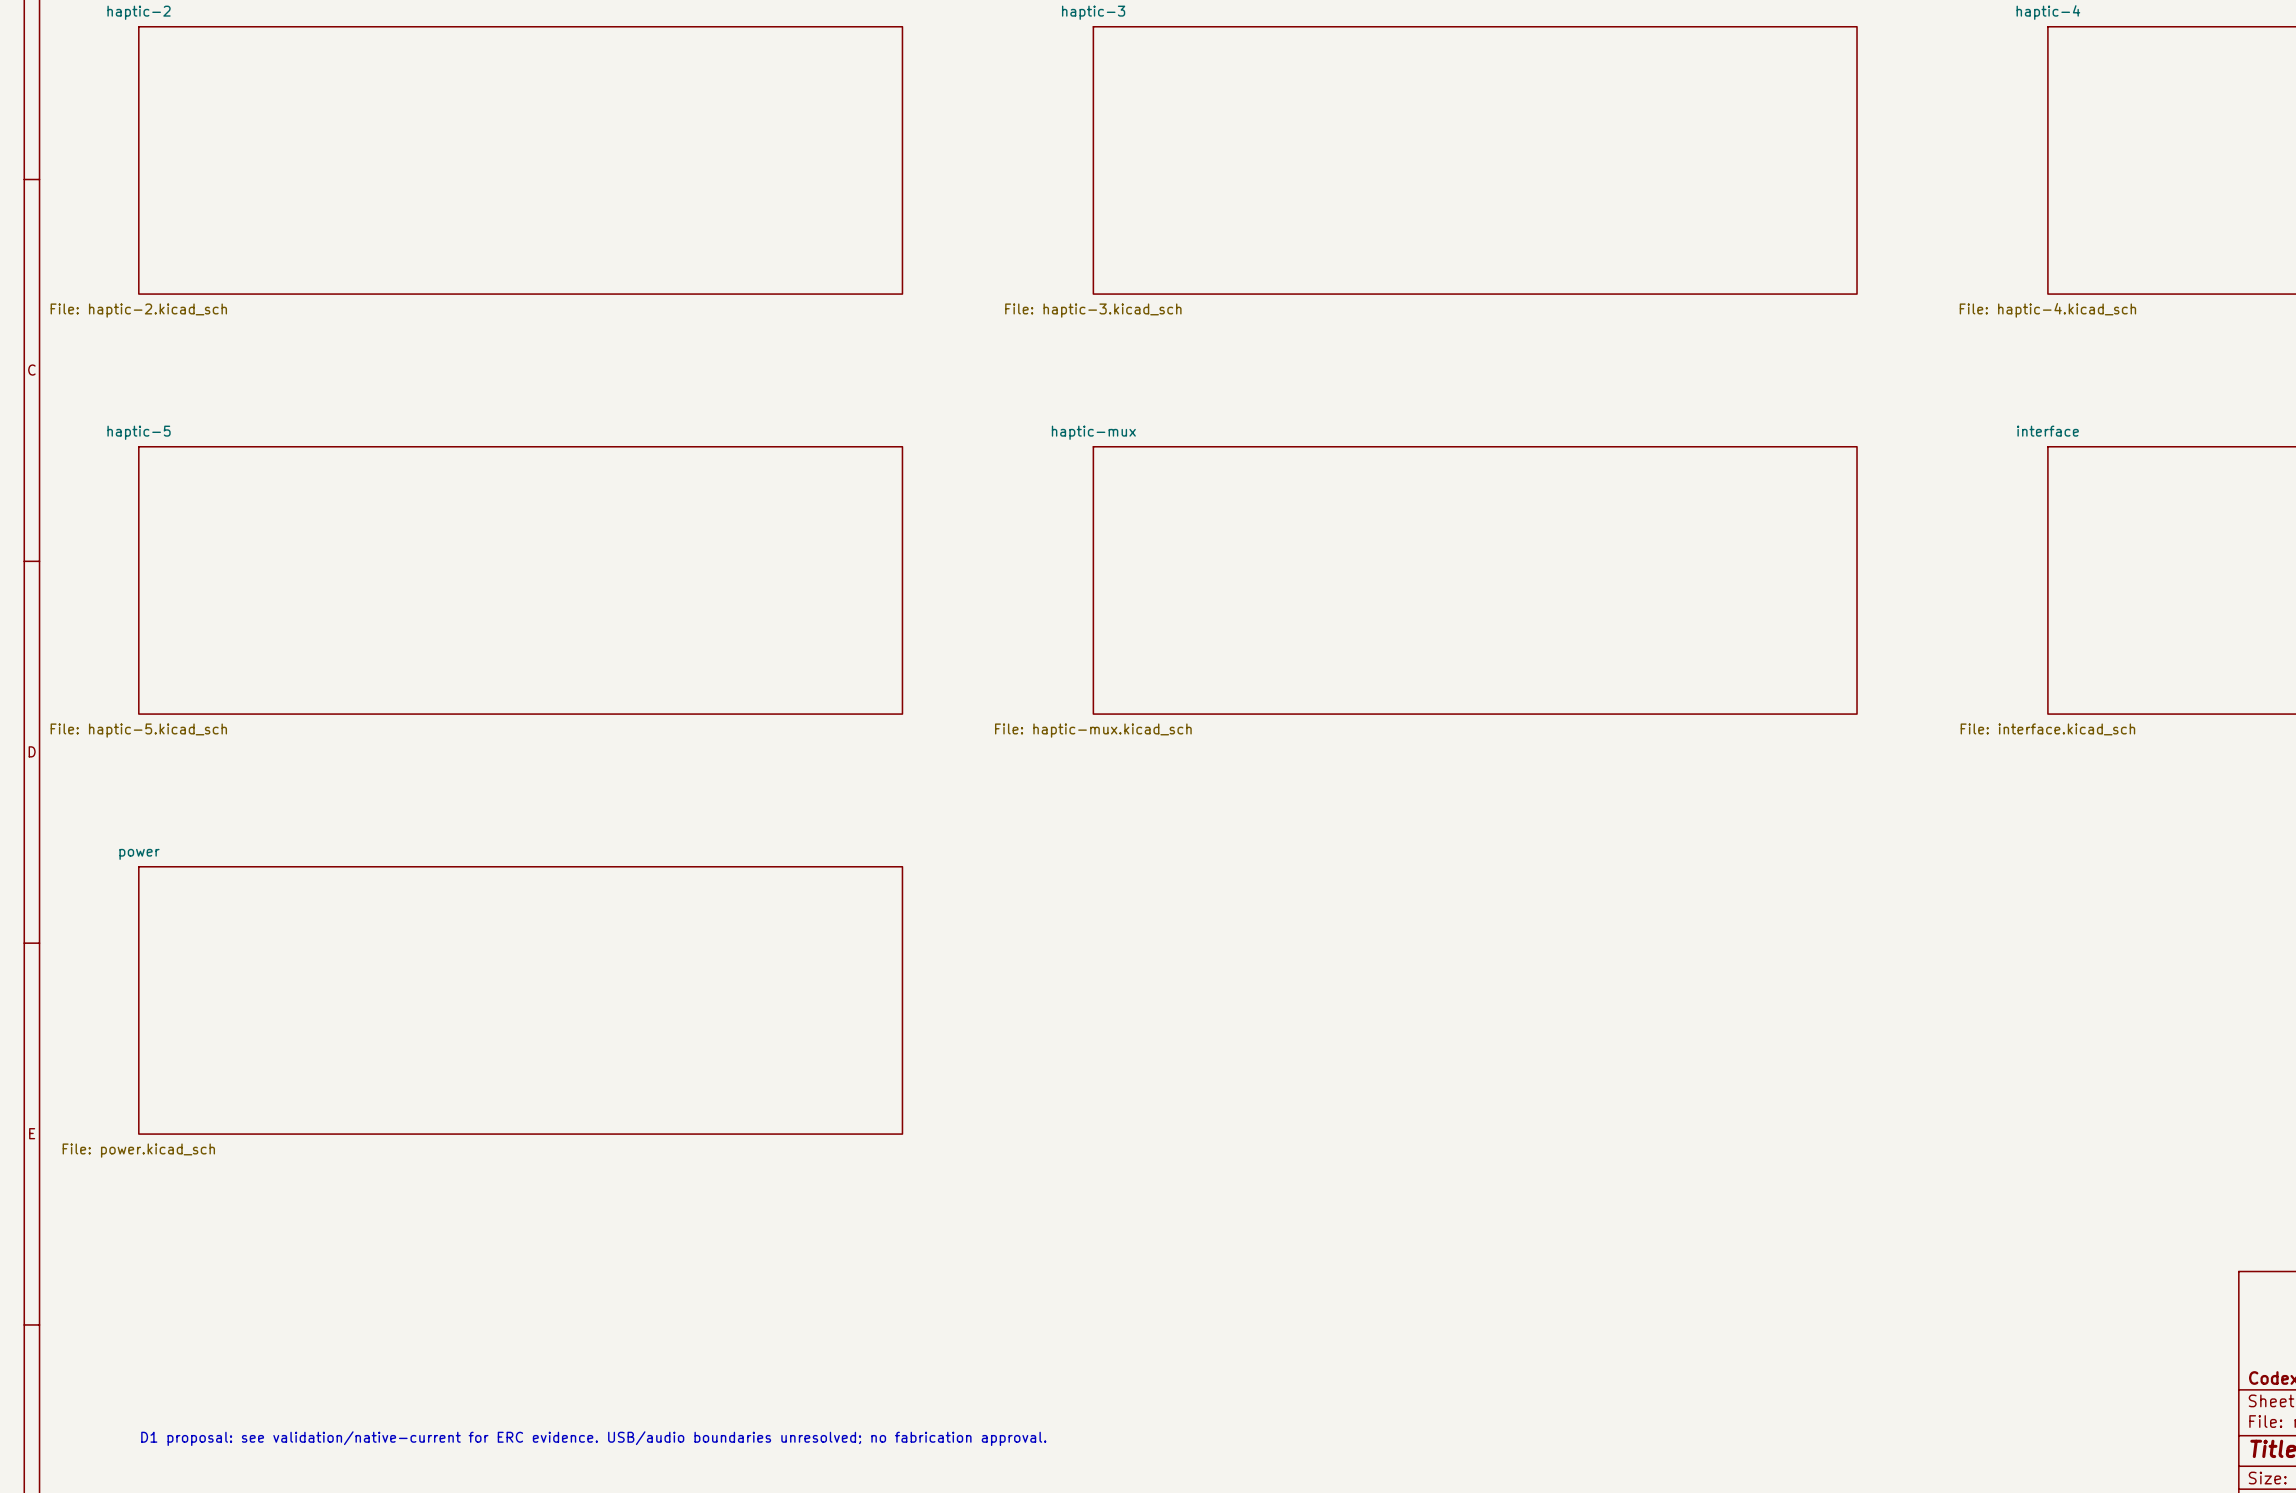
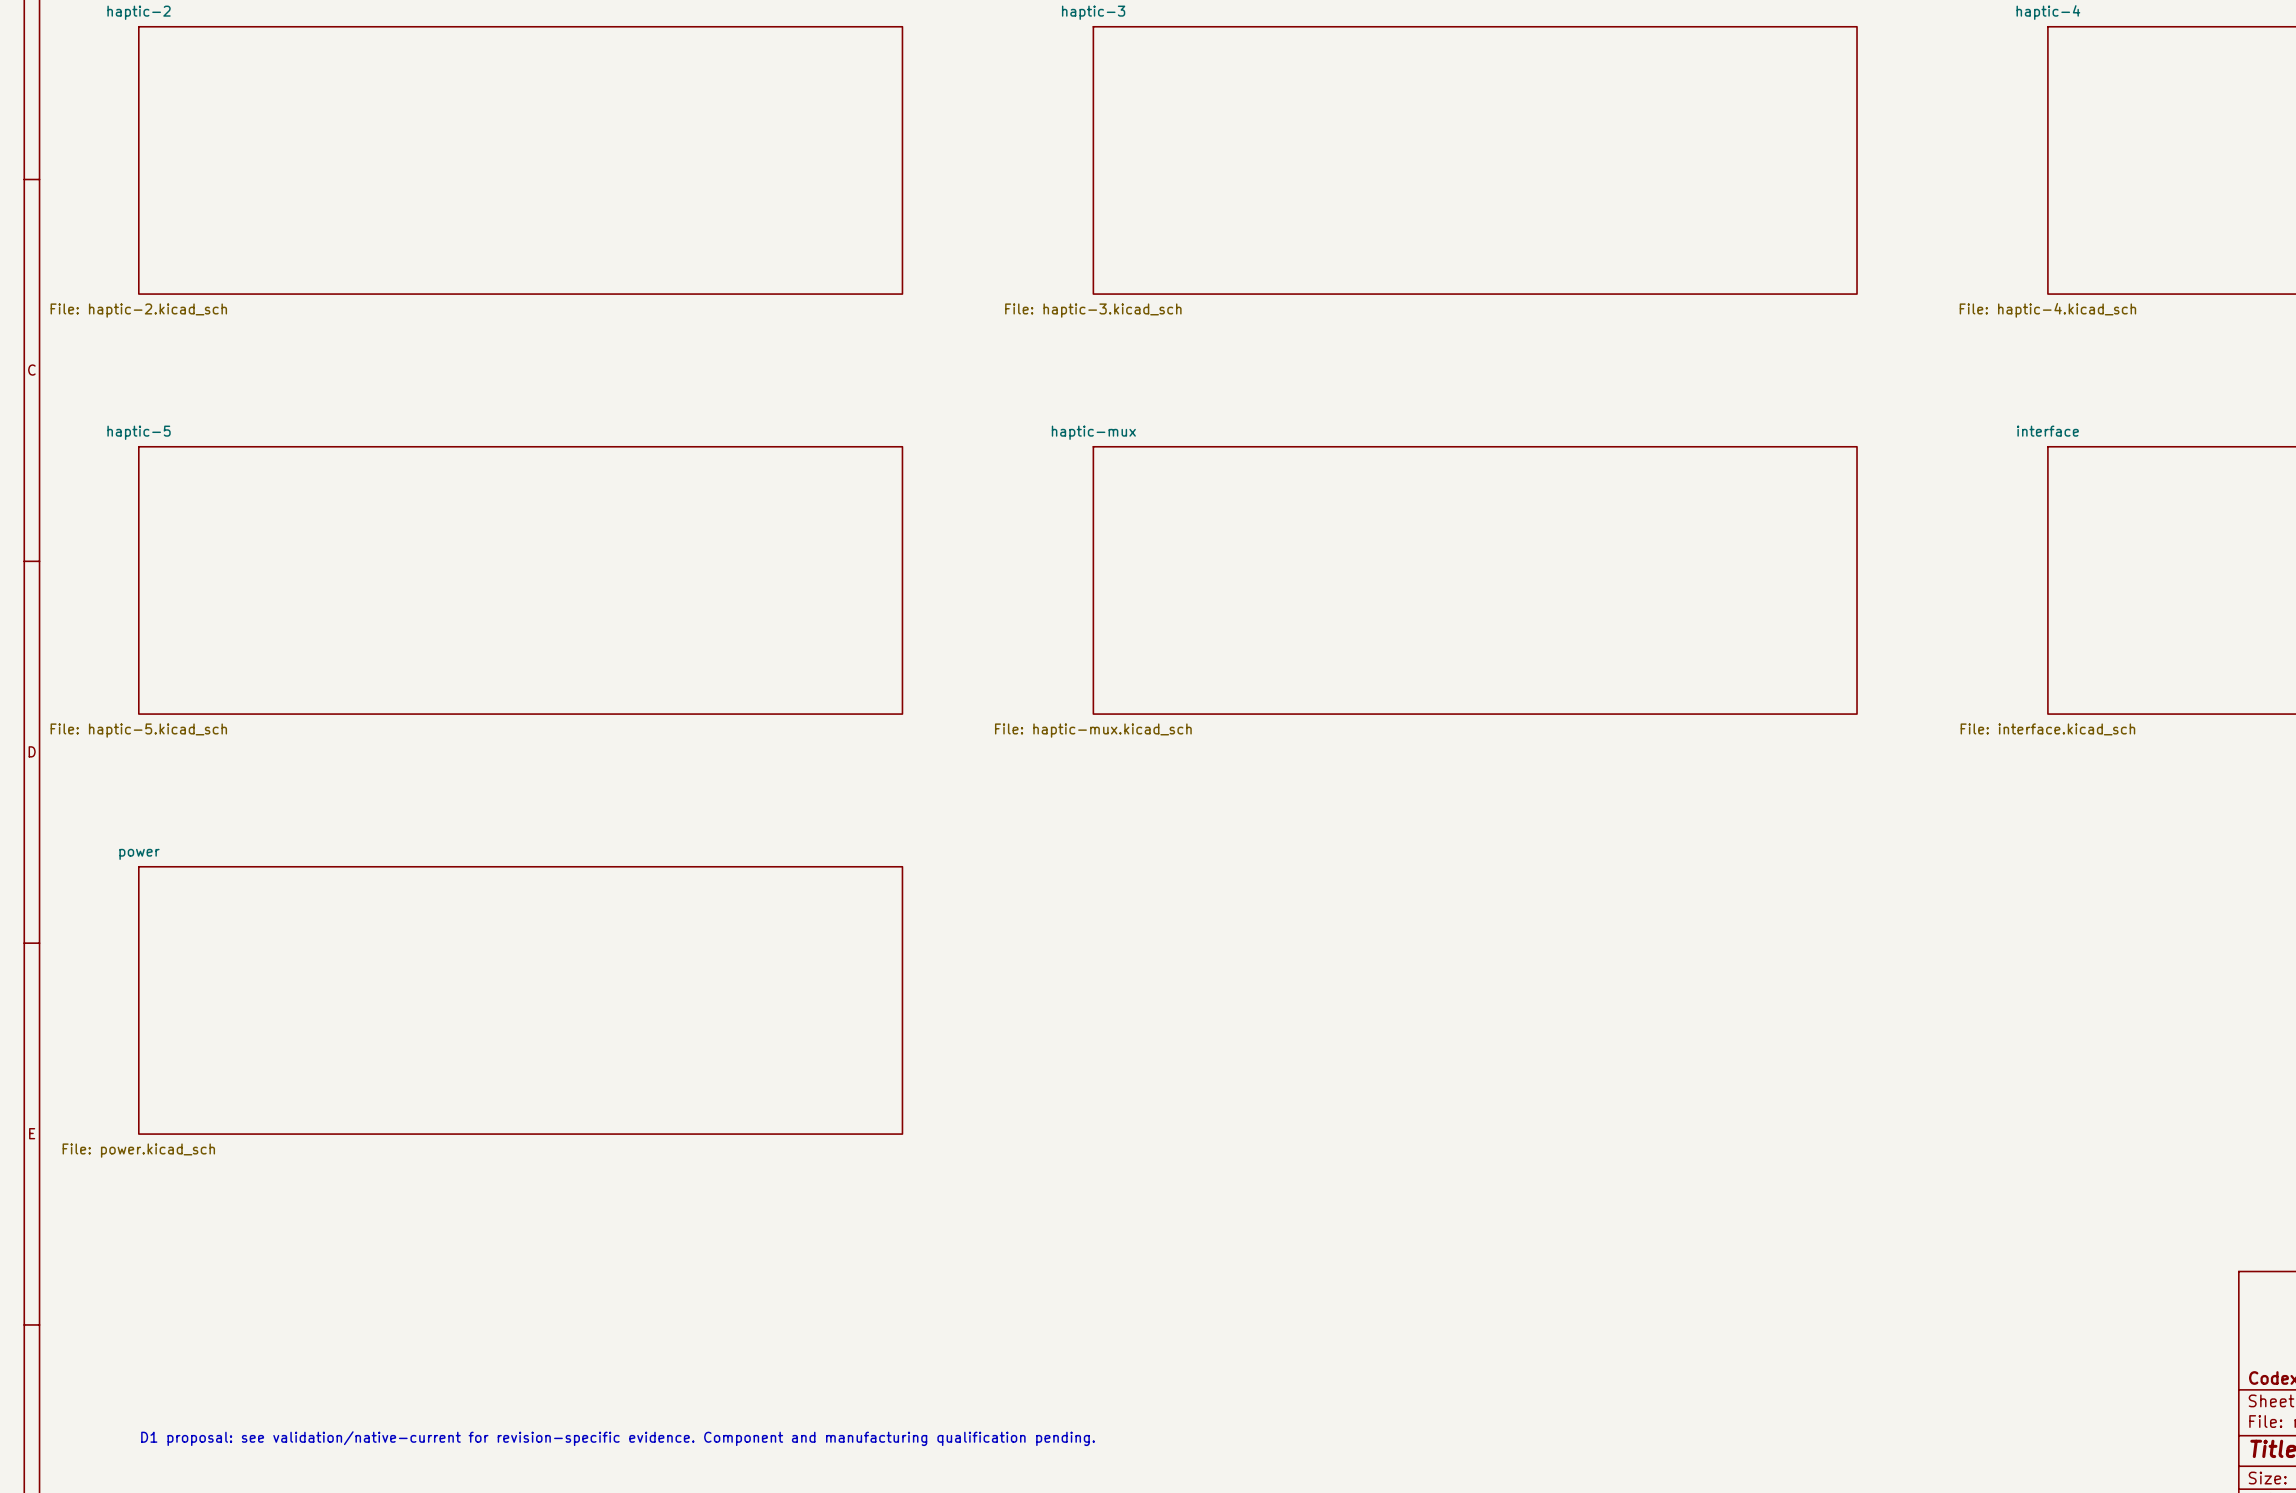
text: D1 proposal: see validation/native-current for ERC evidence. USB/audio boundaries unresolved; no fabrication approval. (593, 1438) -> D1 proposal: see validation/native-current for revision-specific evidence. Component and manufacturing qualification pending. (618, 1438)

